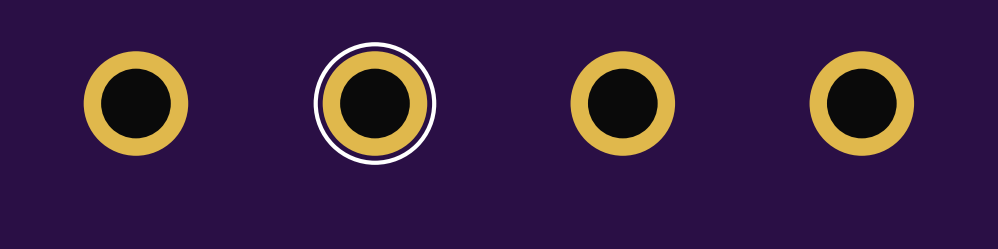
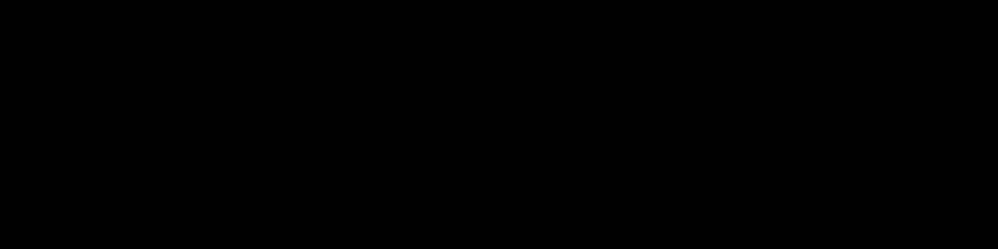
part: (135, 103) -> none
part: (374, 103) -> none
part: (622, 103) -> none
part: (861, 103) -> none

